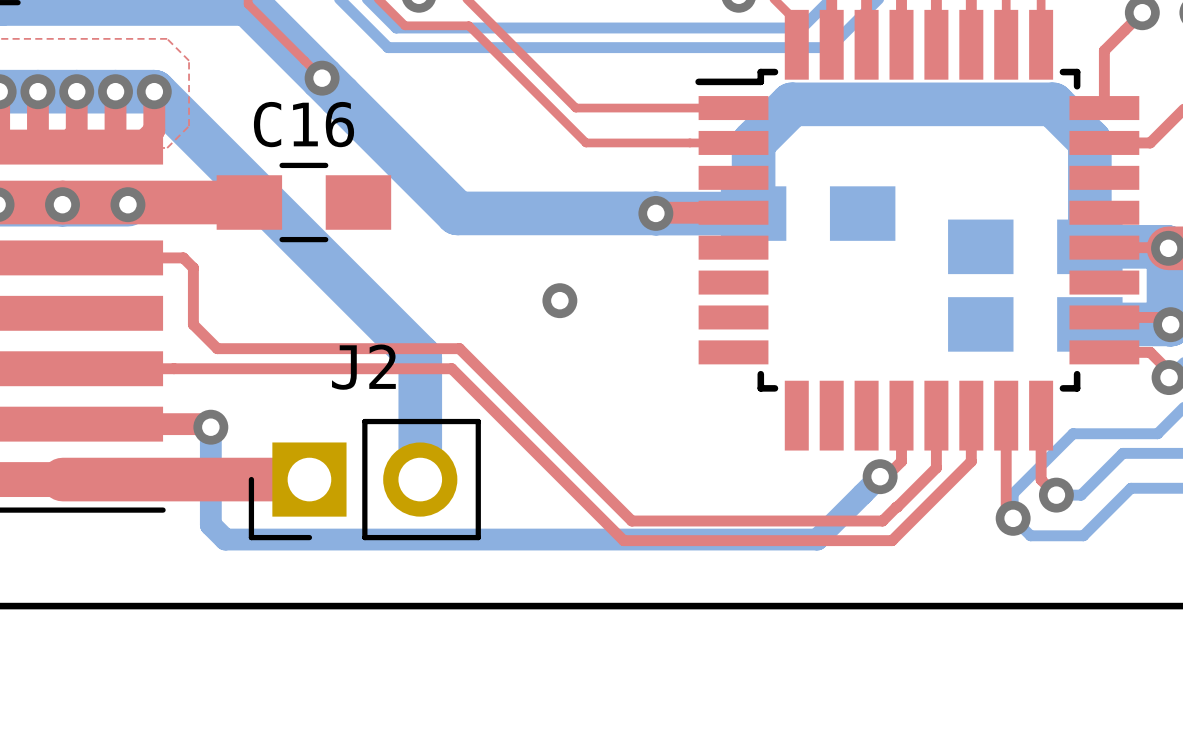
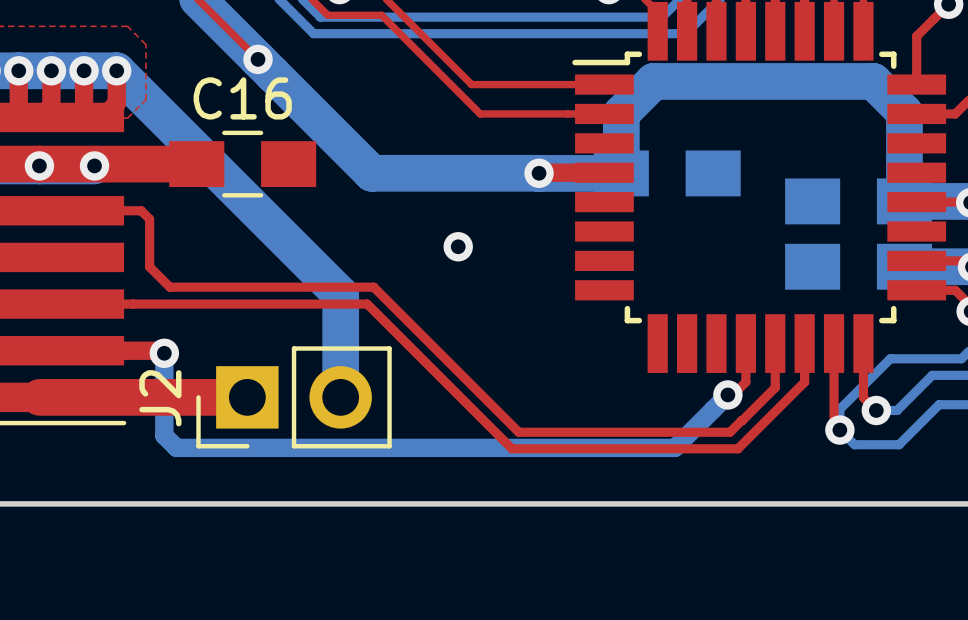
J2 name rotation: 0° (363, 367) -> 90° counterclockwise (160, 398)
J2 name position: J2 (363, 367) -> J2 (160, 398)

